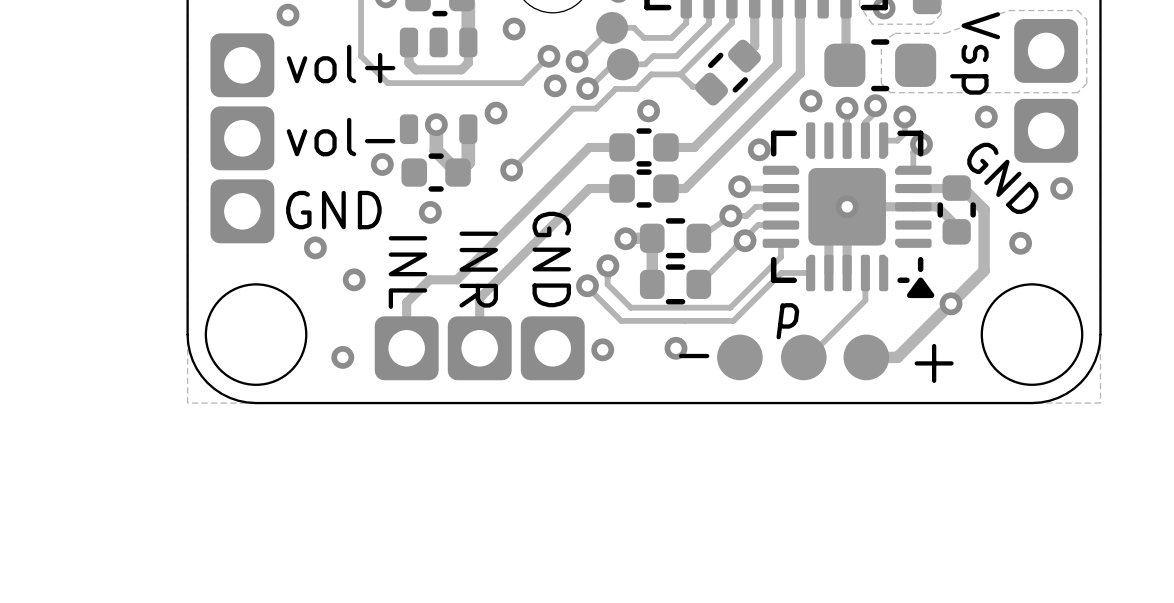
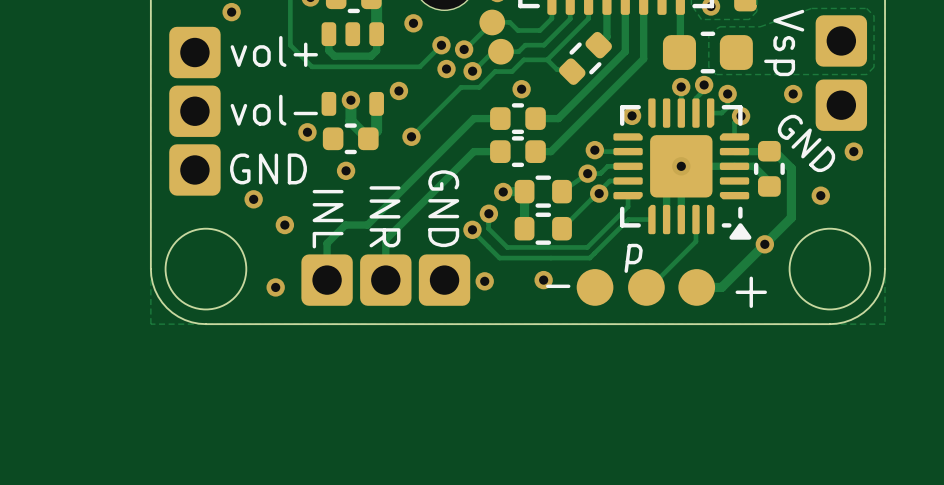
via: (811, 100) -> none
via: none -> (632, 115)
via: (759, 149) -> none

